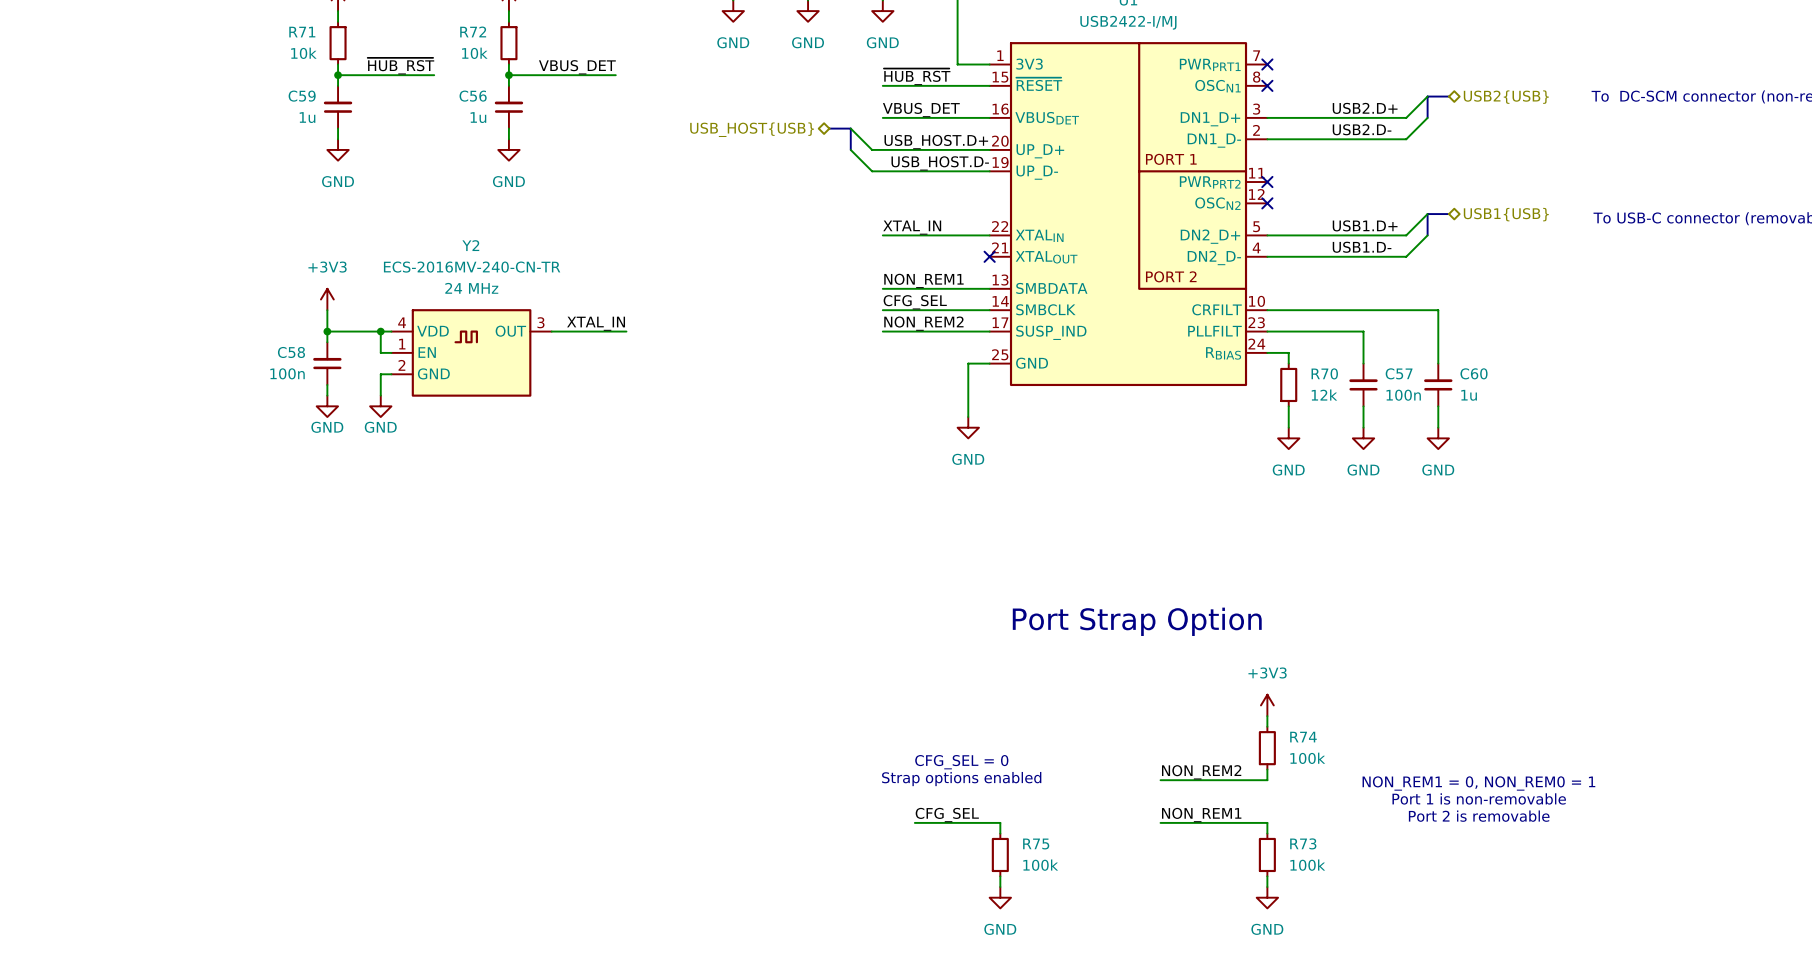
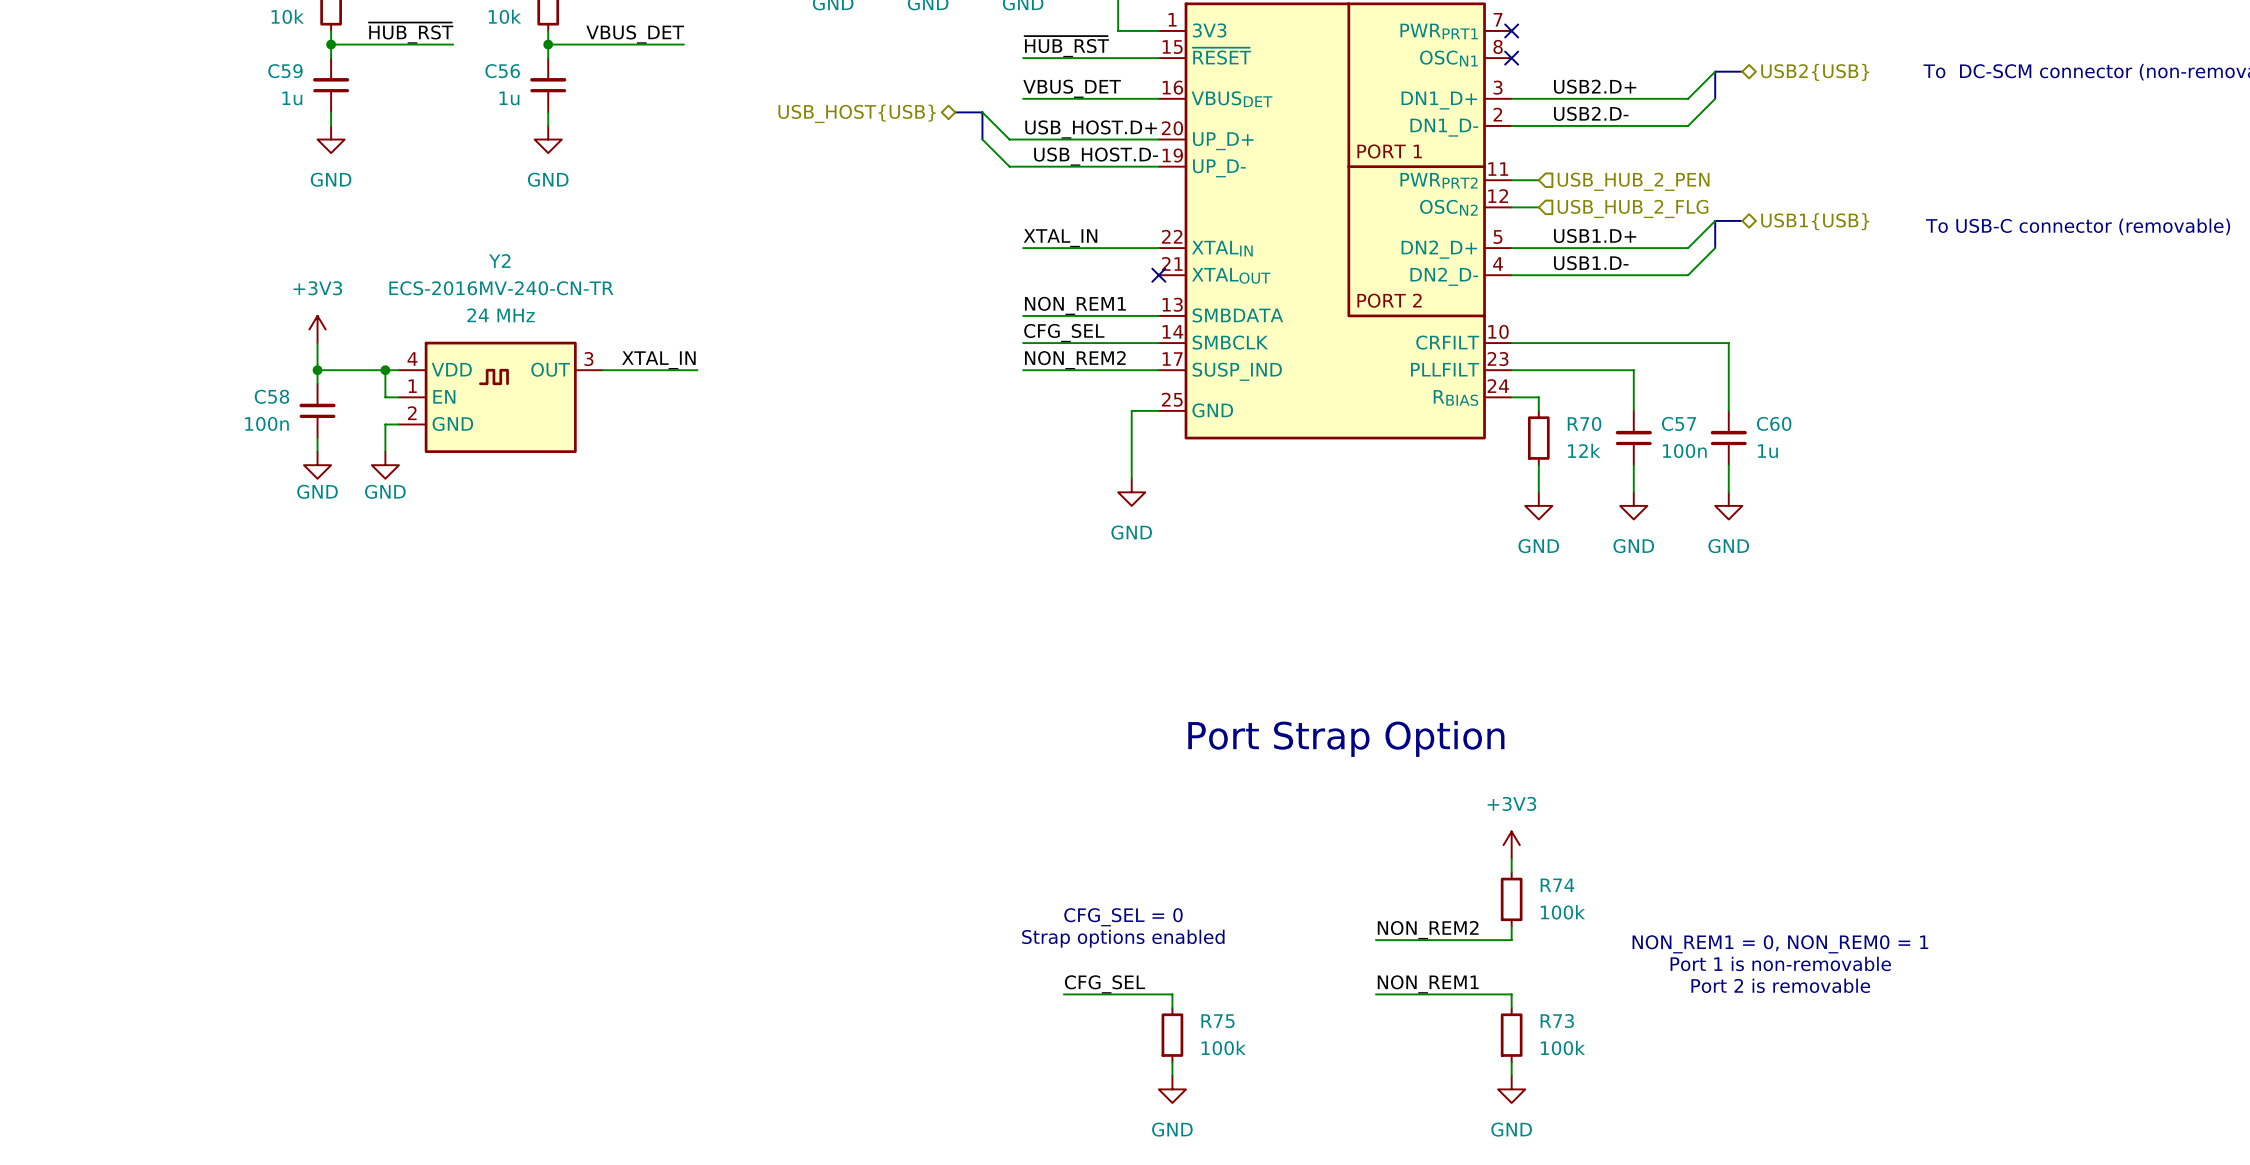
label position: USB2.D+ (1365, 108) -> USB2.D+ (1595, 86)
label position: USB2.D- (1362, 129) -> USB2.D- (1591, 113)
wire: none -> (1511, 180) (1538, 180)
no-connect mark: (1267, 182) -> none
hierarchical label: none -> USB_HUB_2_PEN (1633, 181)
wire: none -> (1511, 207) (1538, 207)
no-connect mark: (1267, 203) -> none
hierarchical label: none -> USB_HUB_2_FLG (1633, 208)
label position: USB1.D+ (1365, 225) -> USB1.D+ (1595, 235)
label position: USB1.D- (1362, 247) -> USB1.D- (1591, 263)

